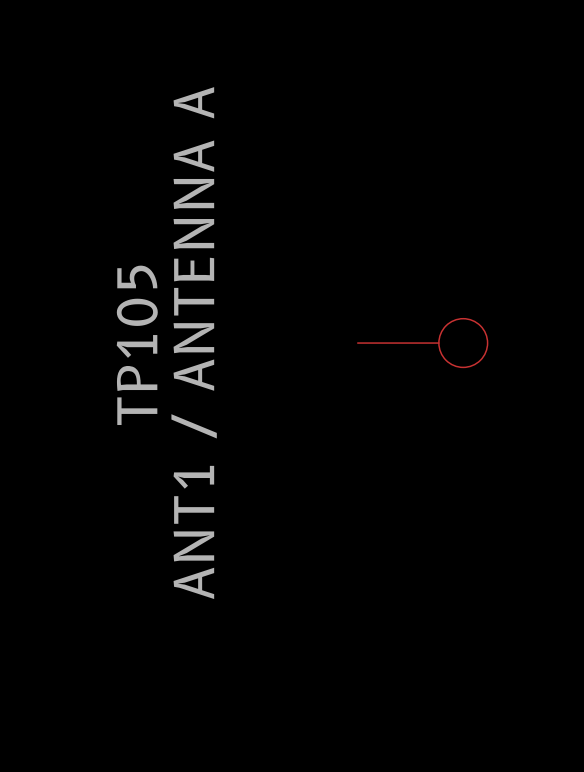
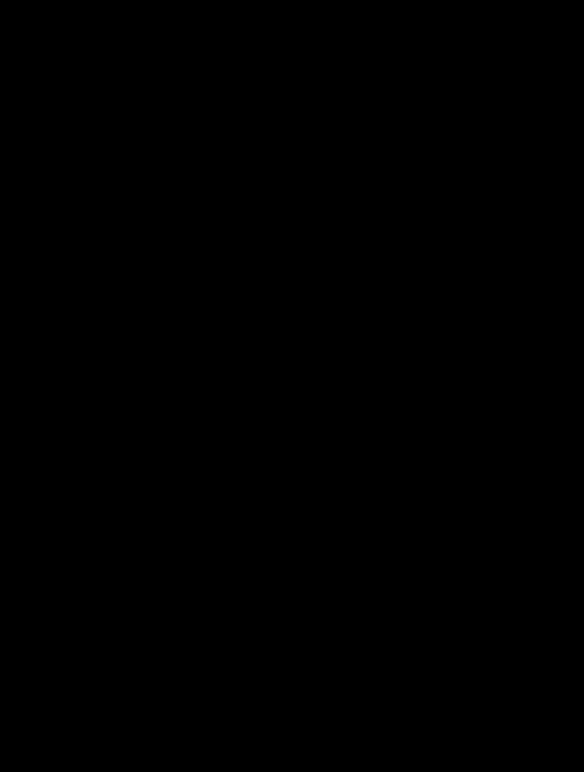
TP105: ANT1 / ANTENNA A (422, 343) -> none

